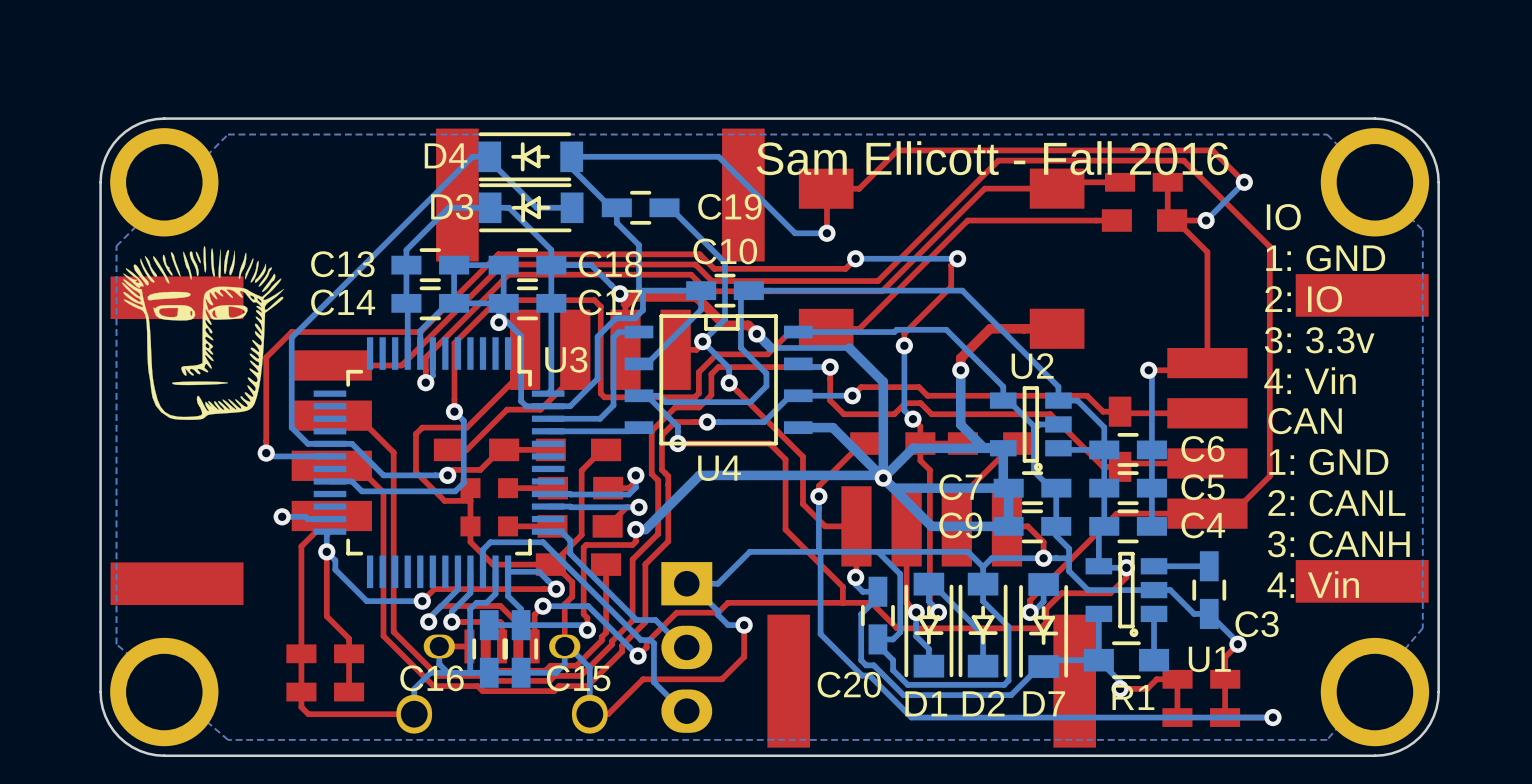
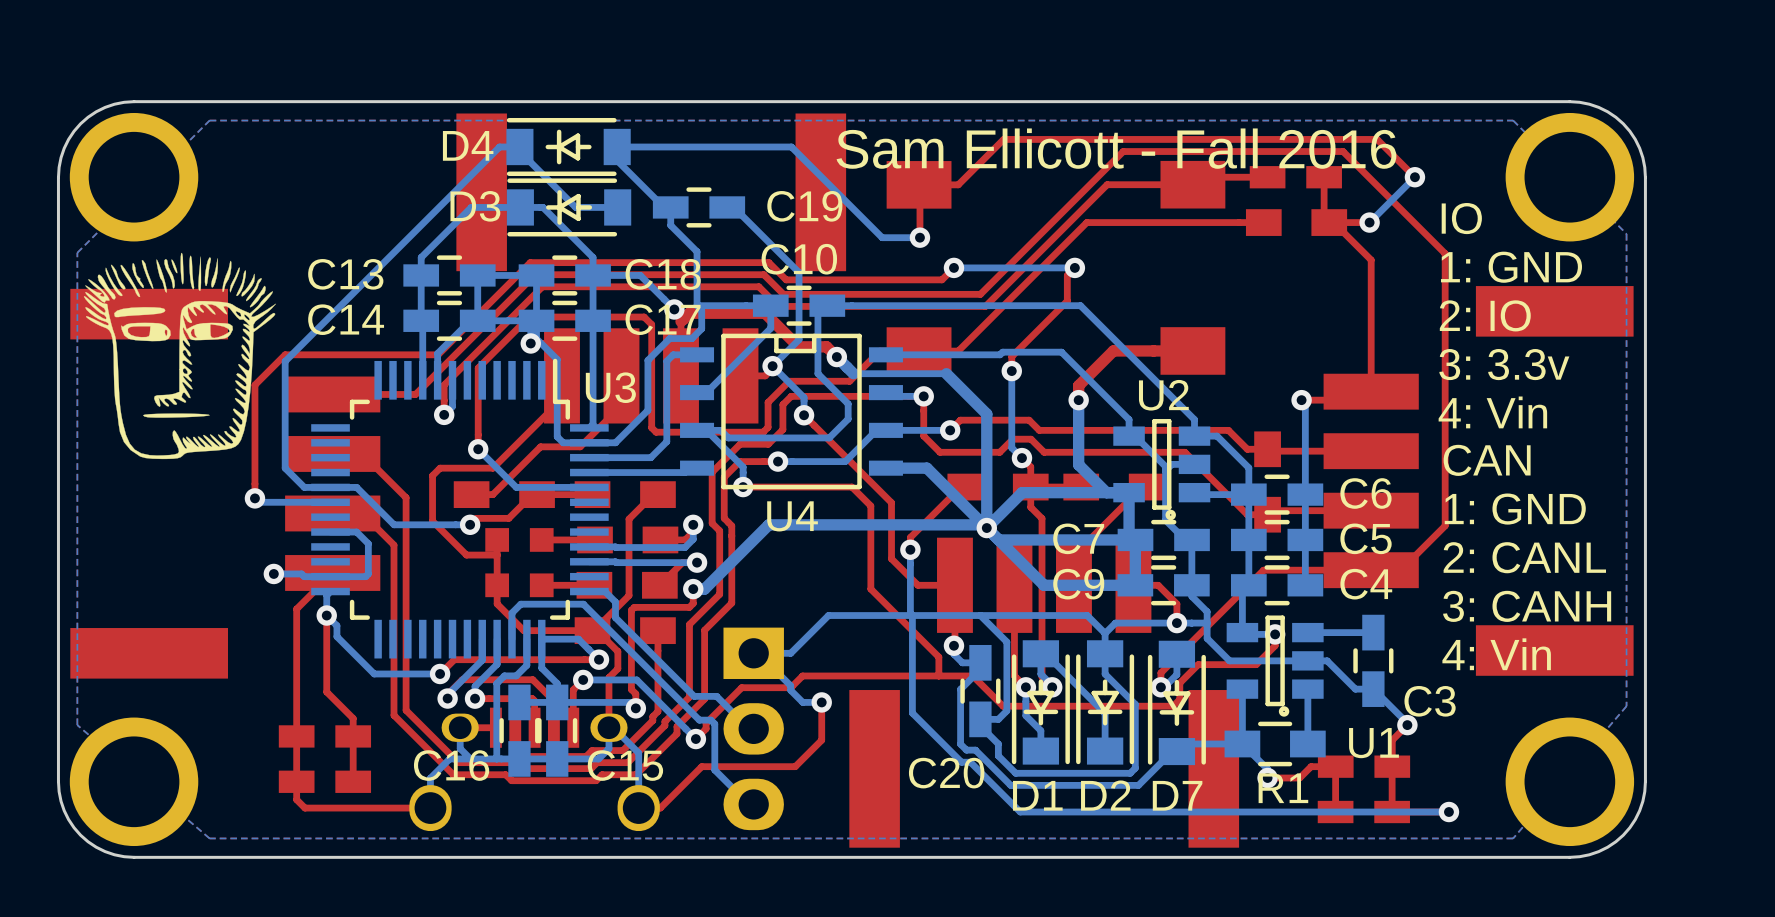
bottom track: (463, 420) (463, 482) (455, 491) (361, 491) -> (330, 576) (365, 576) (368, 573) (368, 543)
bottom track: none -> (489, 460) (516, 487) (589, 487)

